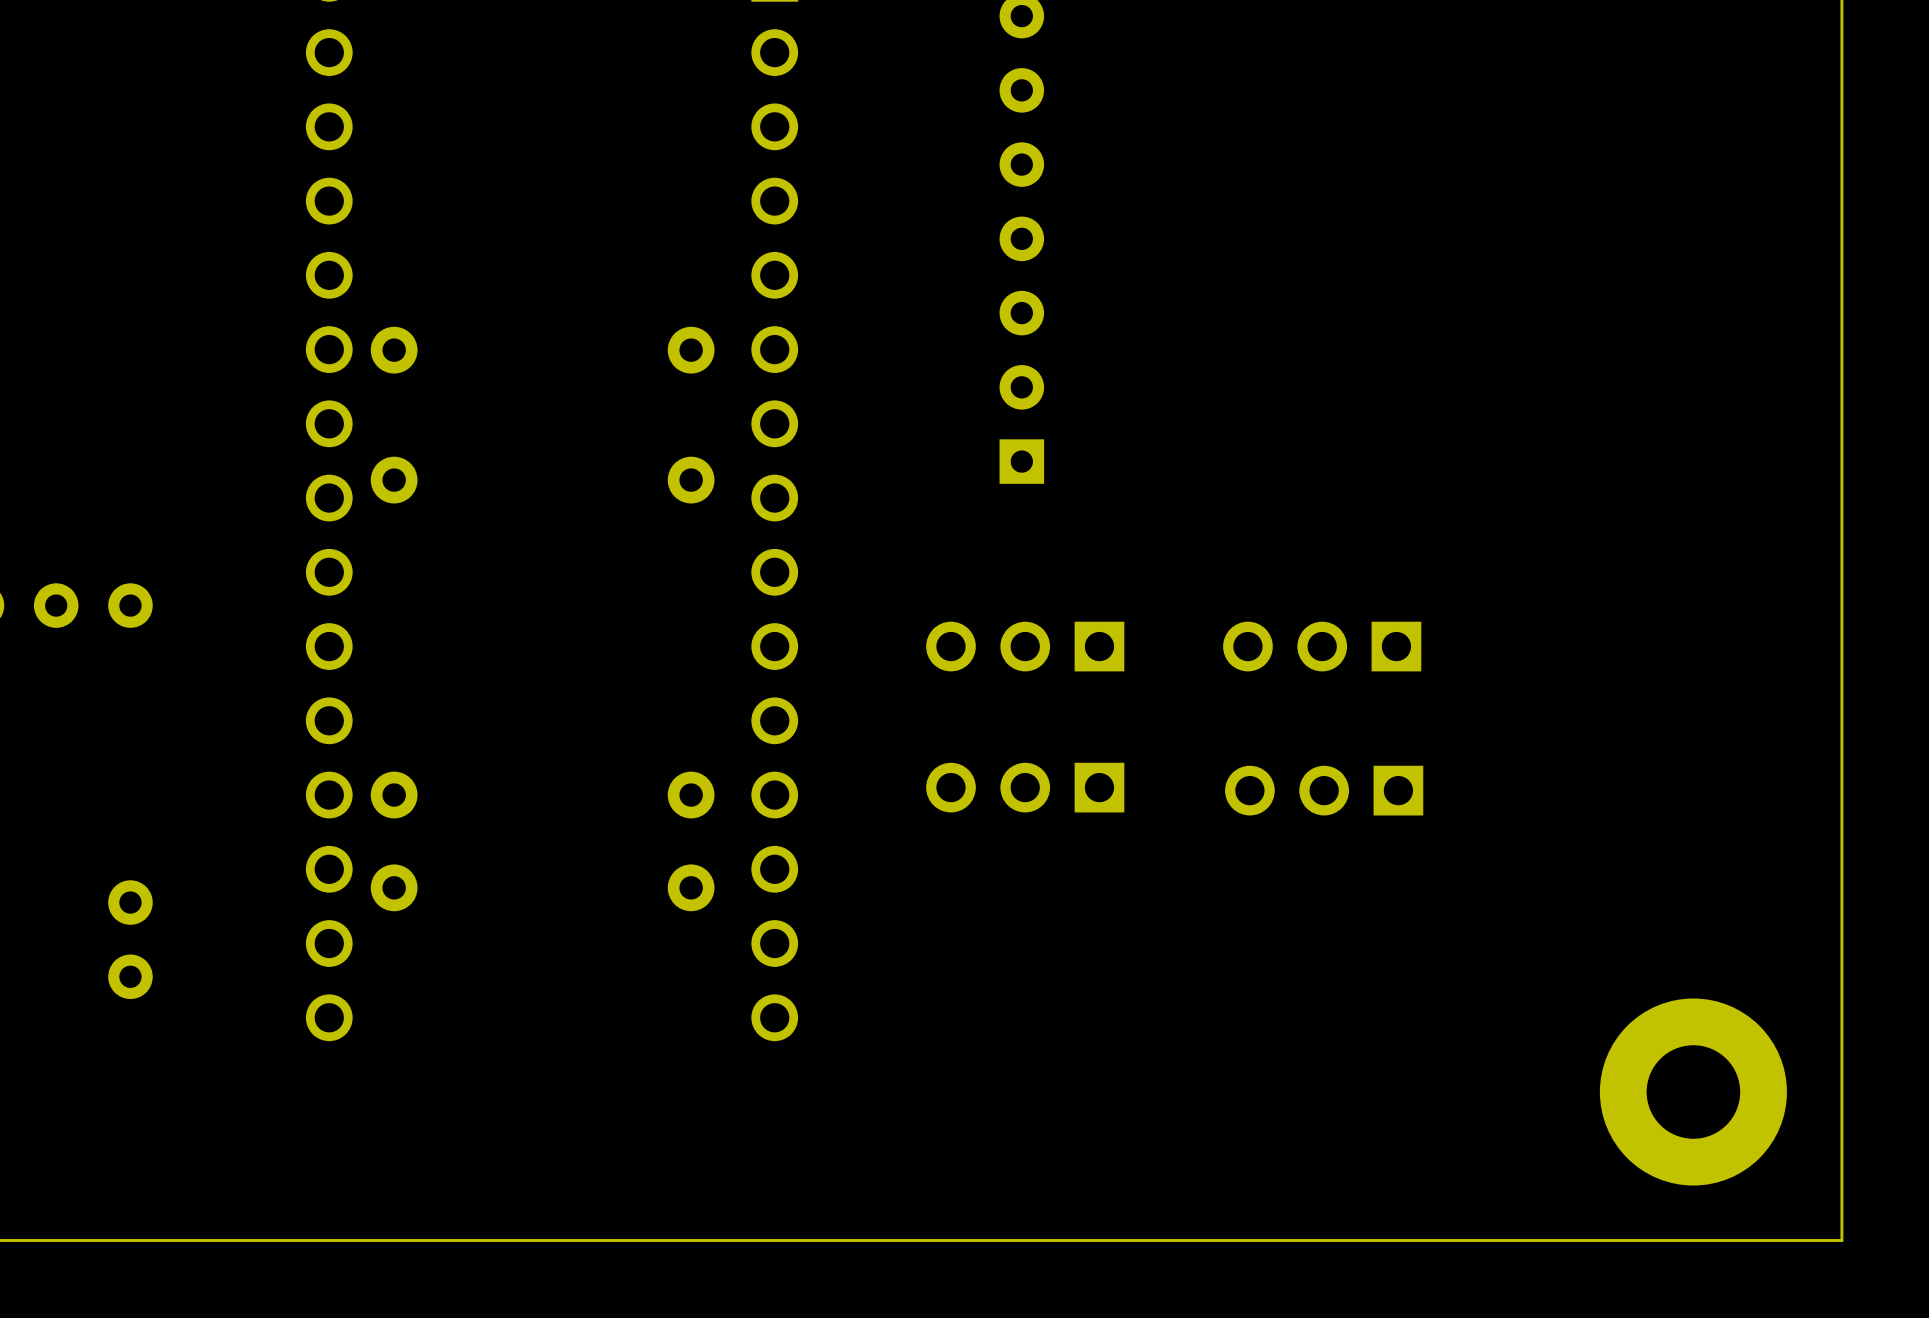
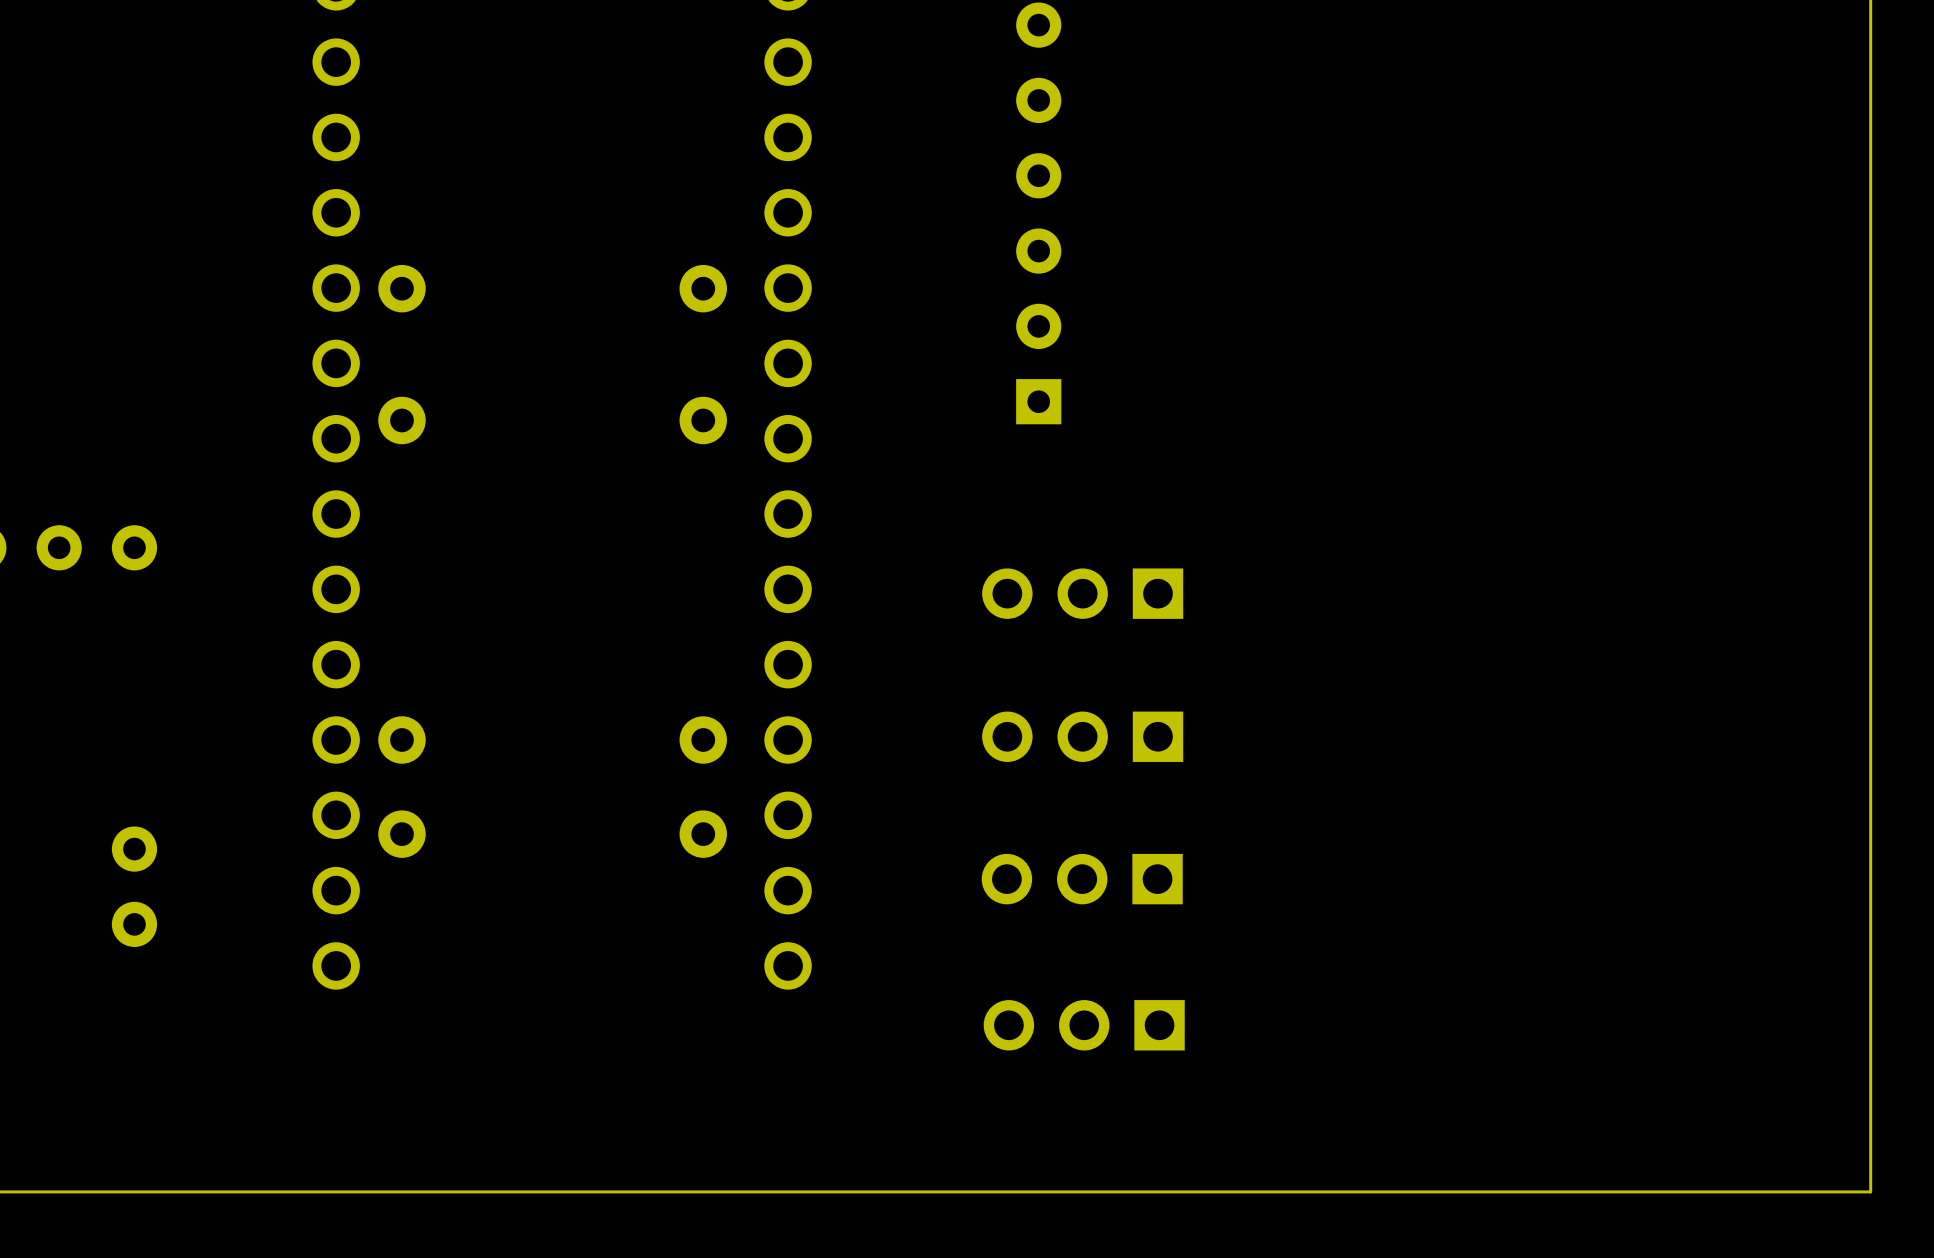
part position: (1025, 646) -> (1082, 593)
part: (1322, 646) -> none
part position: (1025, 787) -> (1082, 736)
part: (1324, 790) -> none
part: none -> (1082, 879)
part: none -> (1084, 1025)
part: (1693, 1092) -> none

